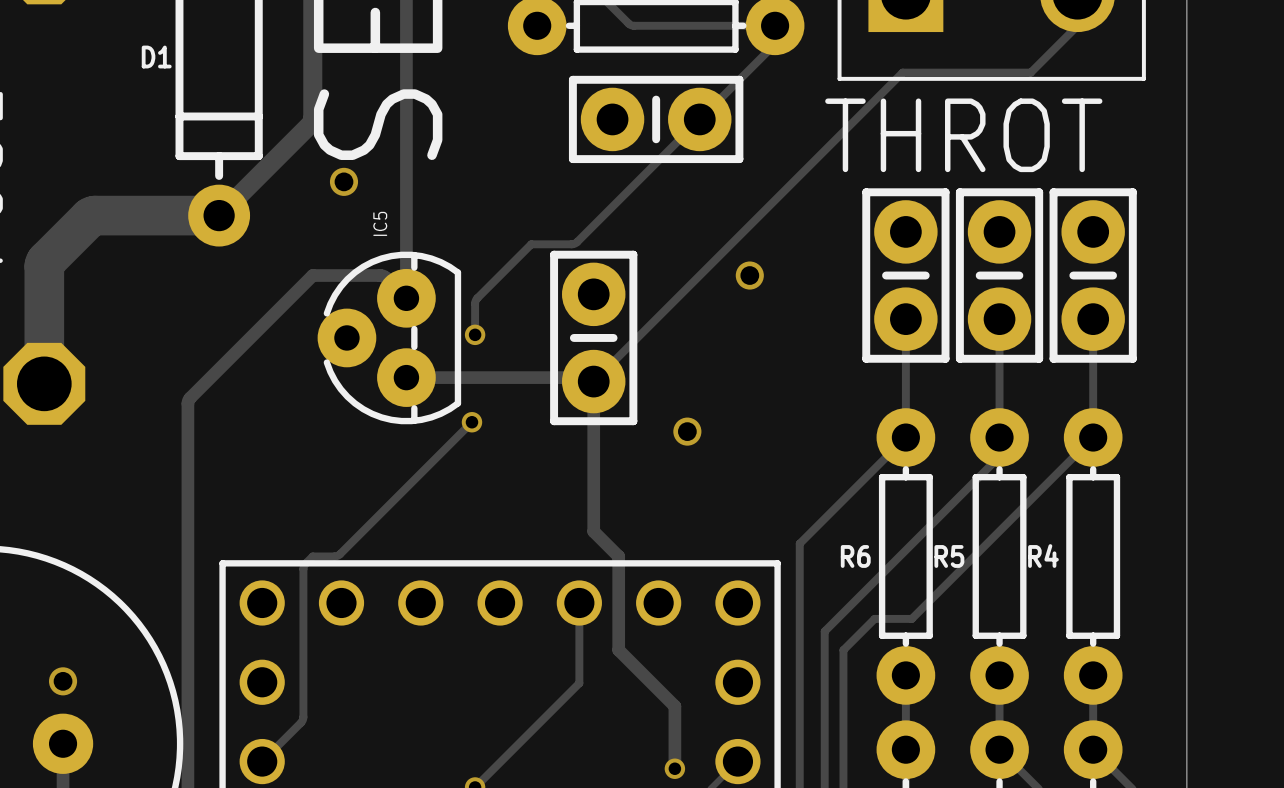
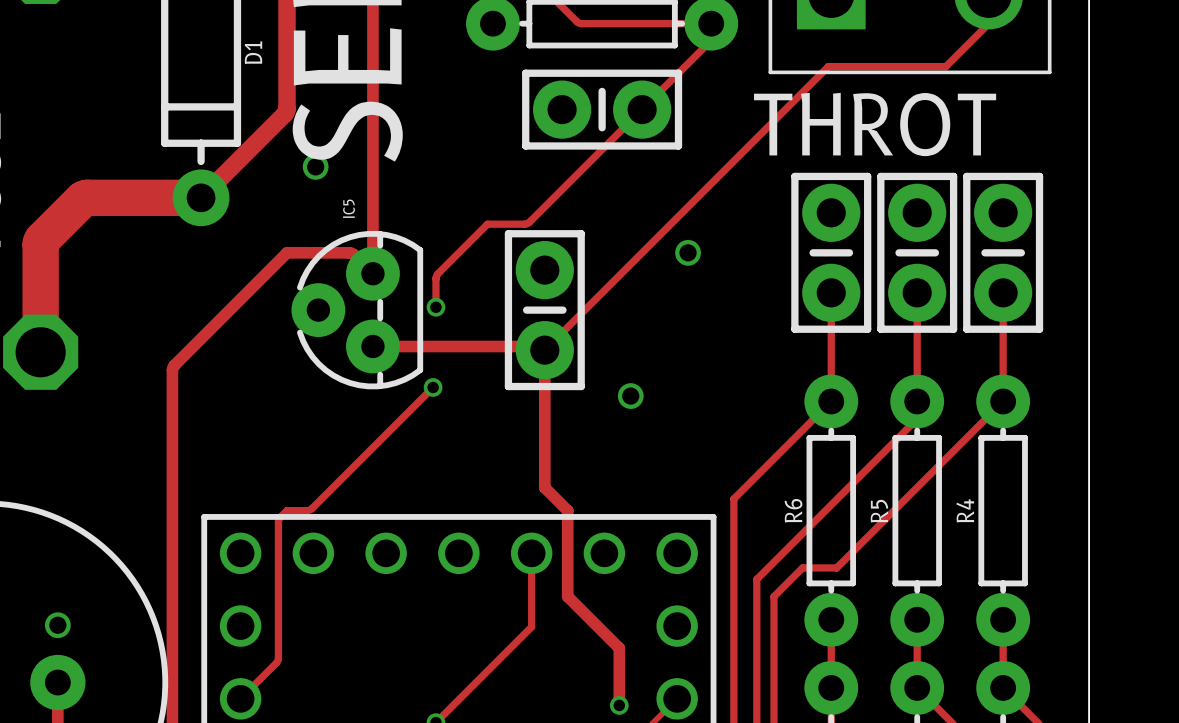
D1 name rotation: 0° (156, 57) -> 90° counterclockwise (253, 52)
D1 name position: D1 (156, 57) -> D1 (253, 52)
R6 name rotation: 0° (855, 556) -> 90° counterclockwise (793, 510)
R5 name rotation: 0° (949, 556) -> 90° counterclockwise (879, 511)
R4 name rotation: 0° (1043, 556) -> 90° counterclockwise (965, 510)

